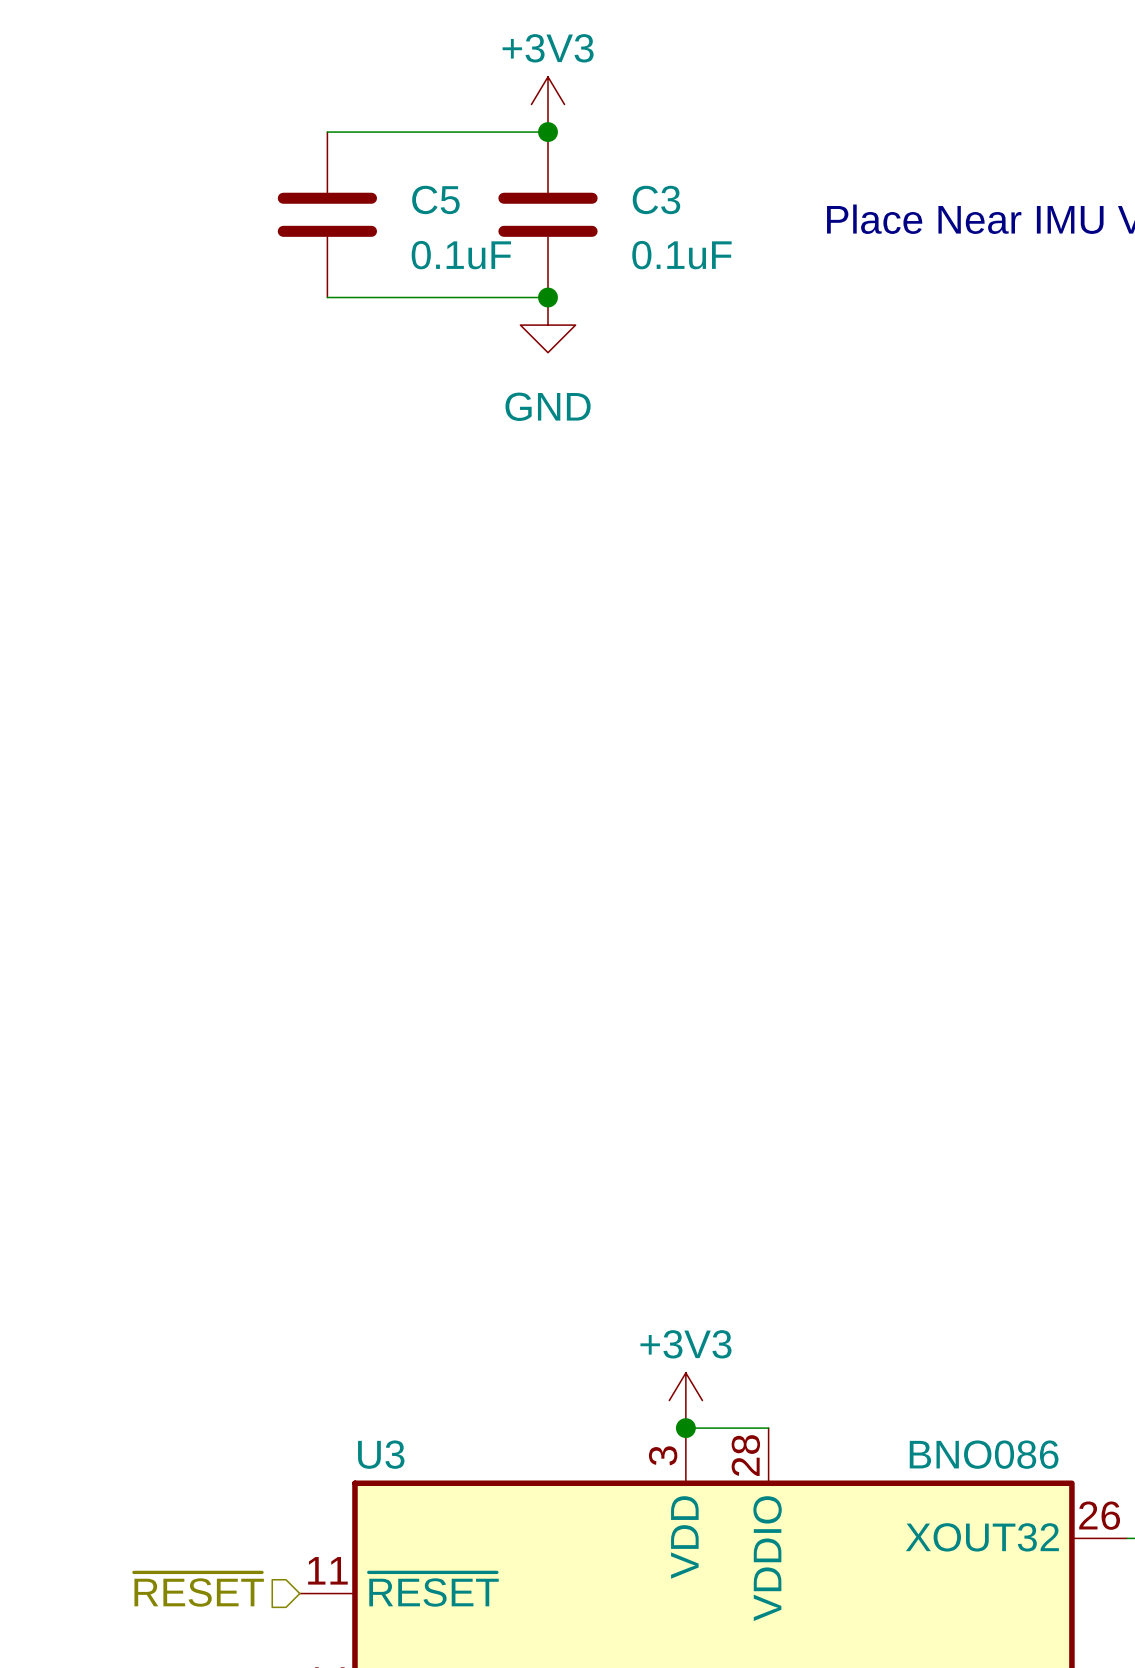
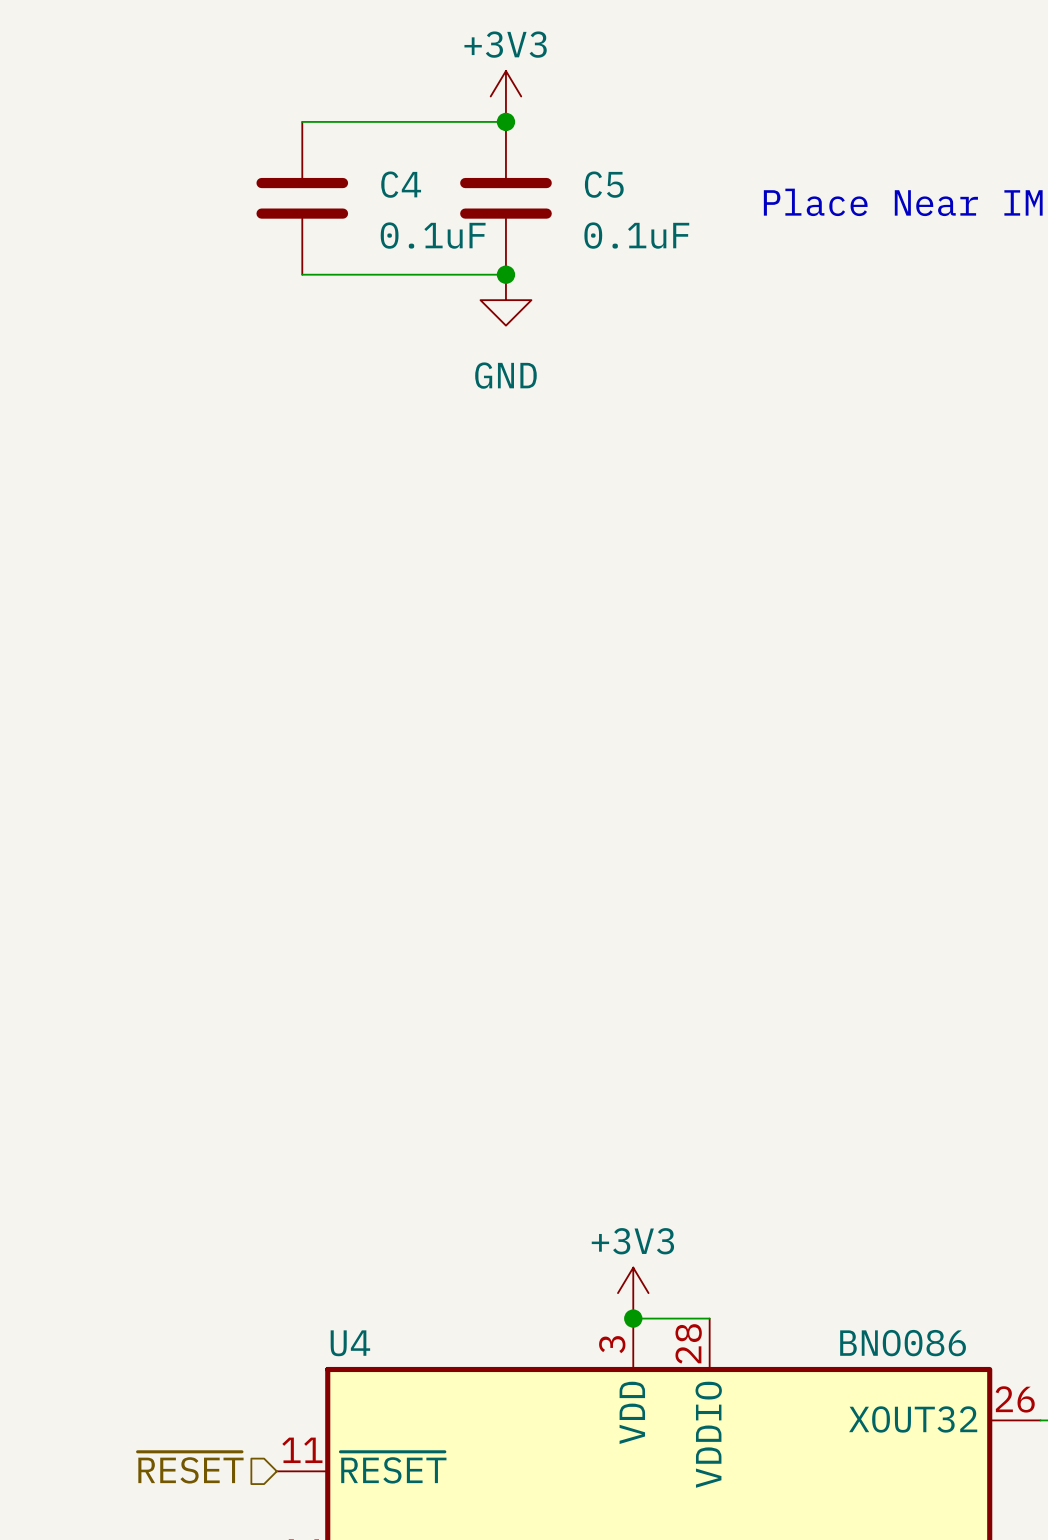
C5 name: C5 (435, 199) -> C4 (401, 184)
C3 name: C3 (656, 199) -> C5 (604, 184)
U3 name: U3 (381, 1454) -> U4 (350, 1343)

